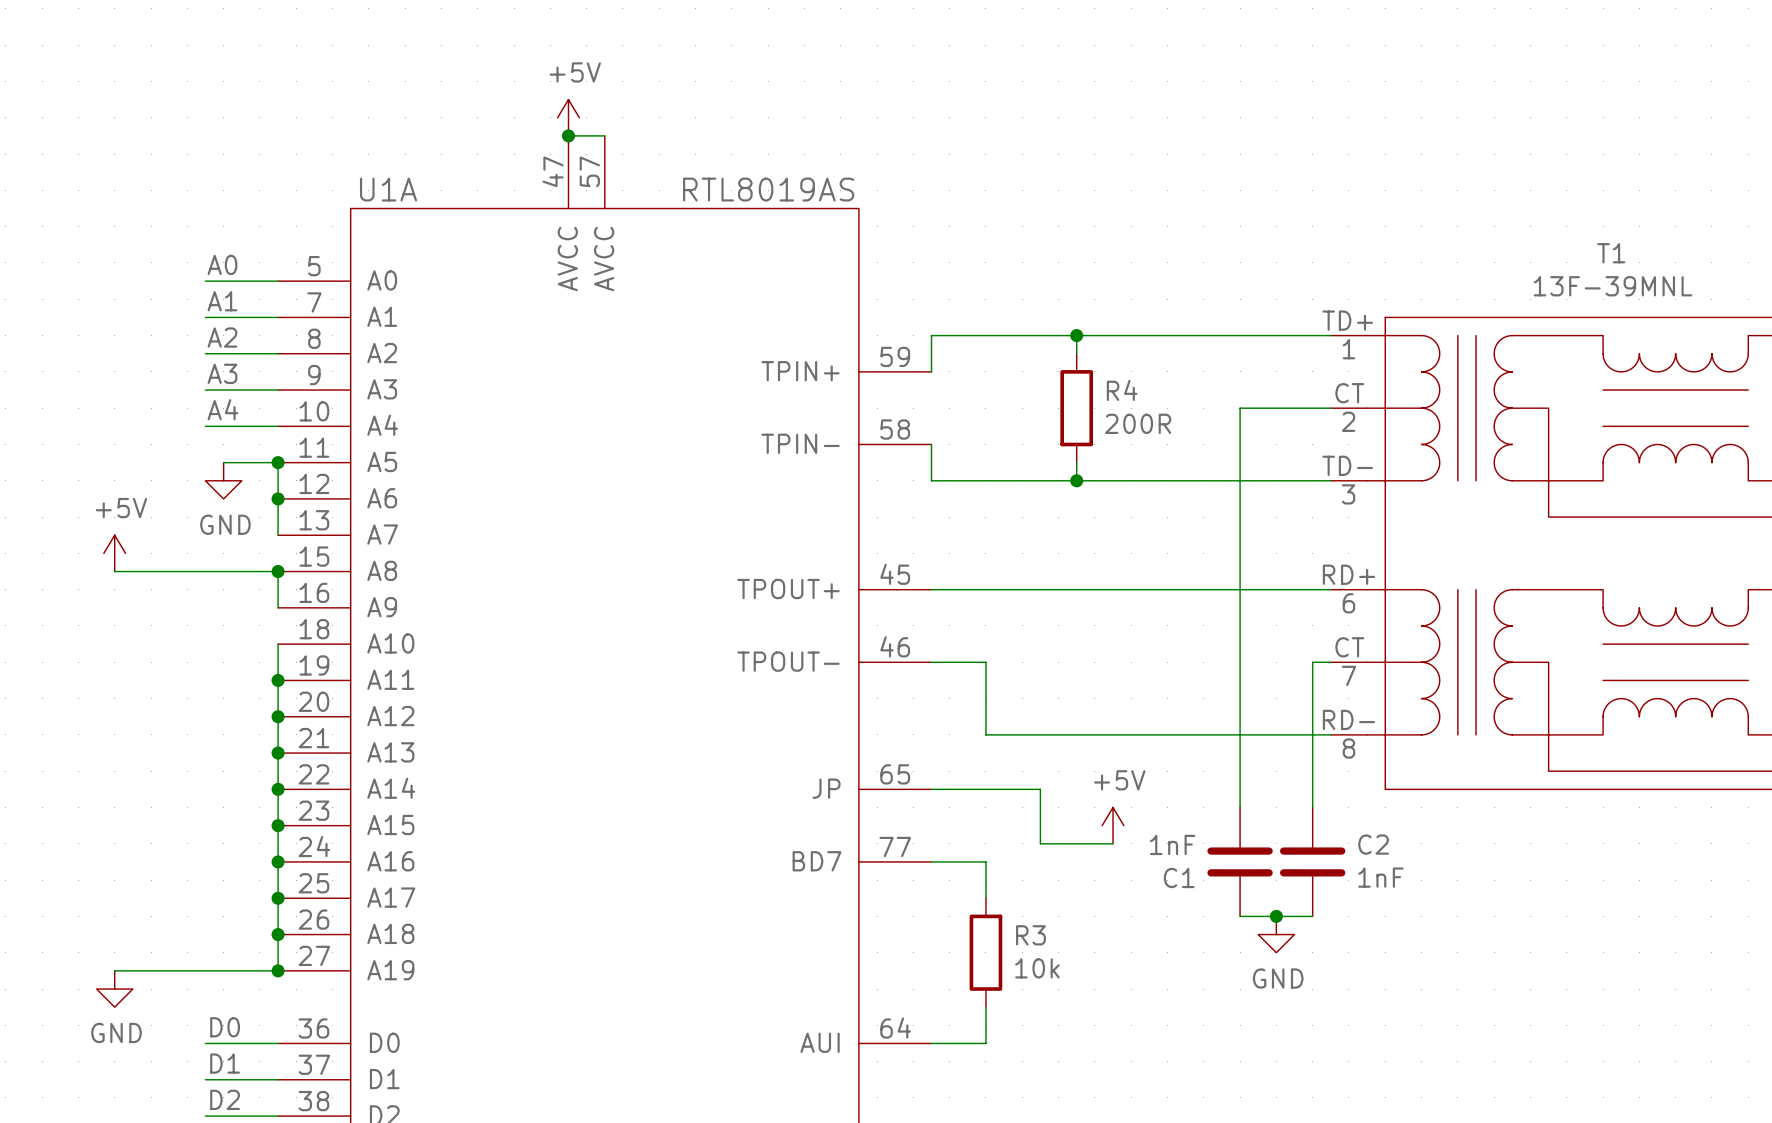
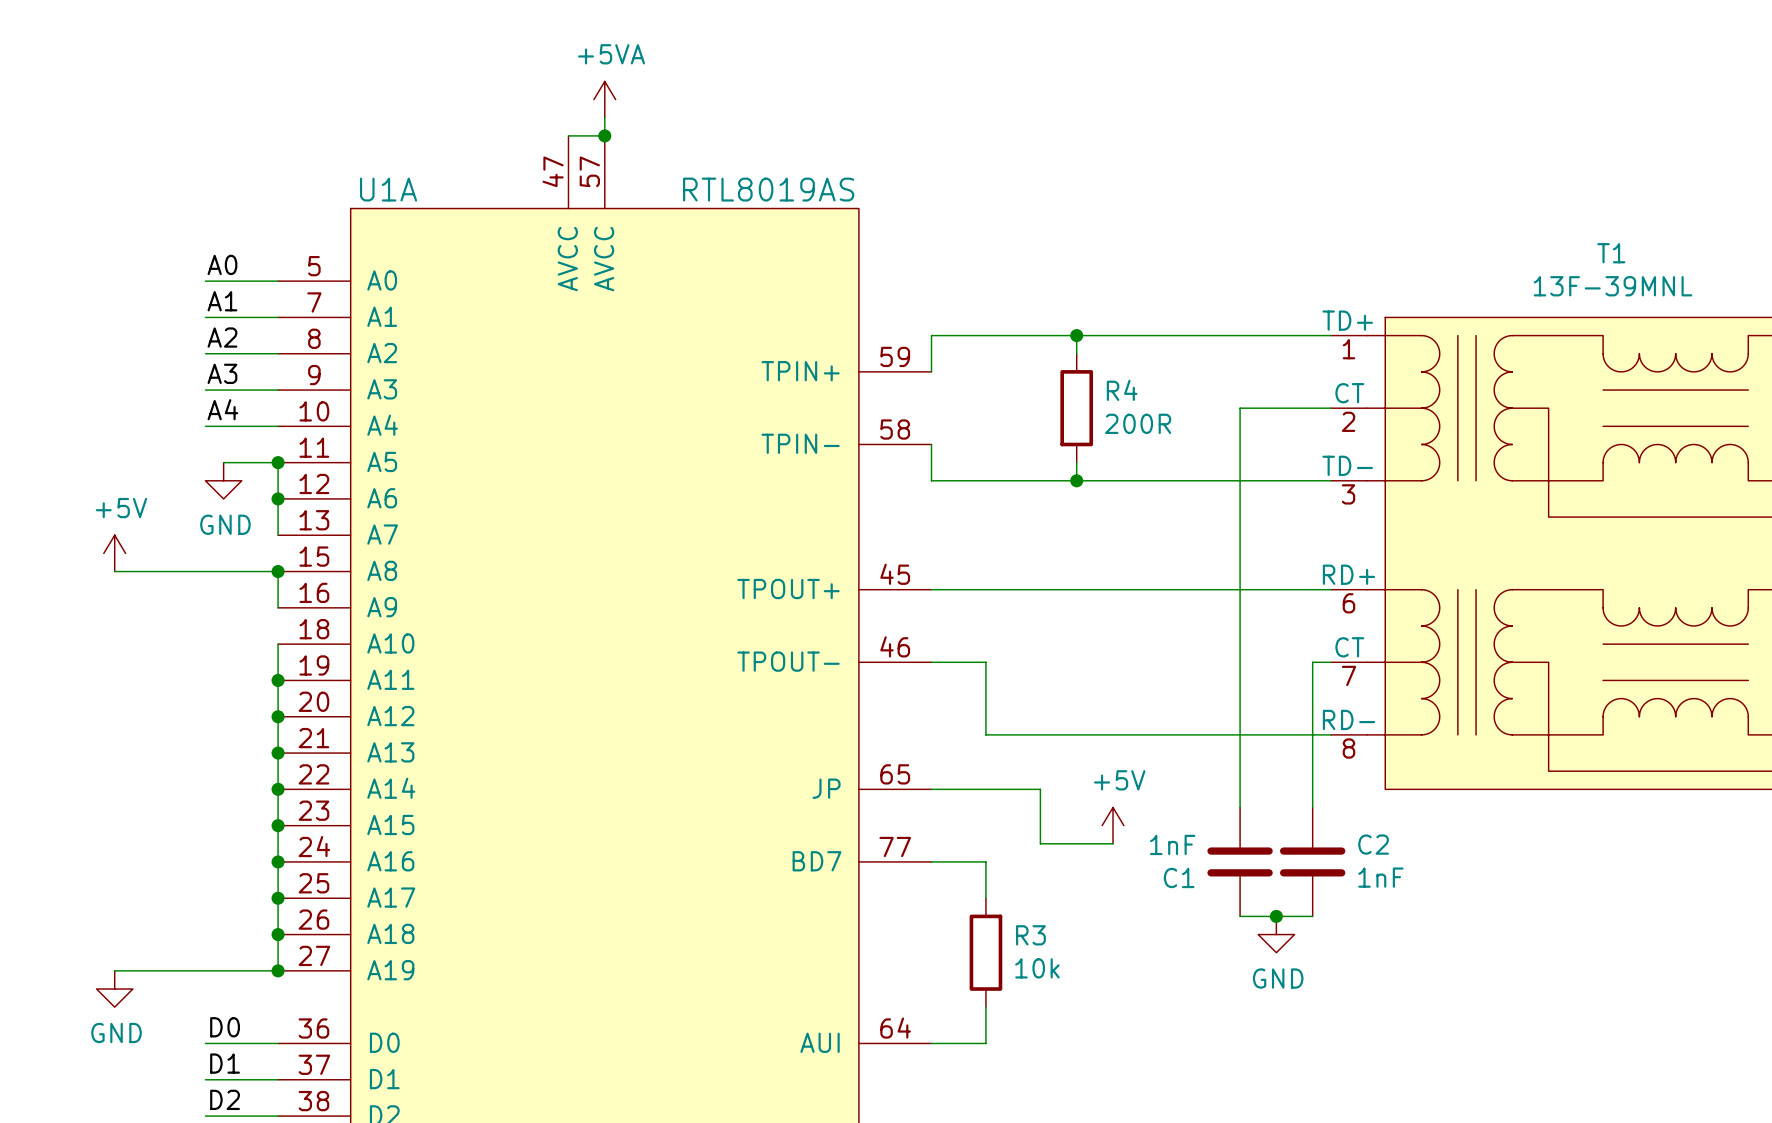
power symbol: none -> +5VA (604, 99)
power symbol: +5V (568, 117) -> none
wire: none -> (604, 117) (604, 135)
junction position: (568, 135) -> (604, 135)

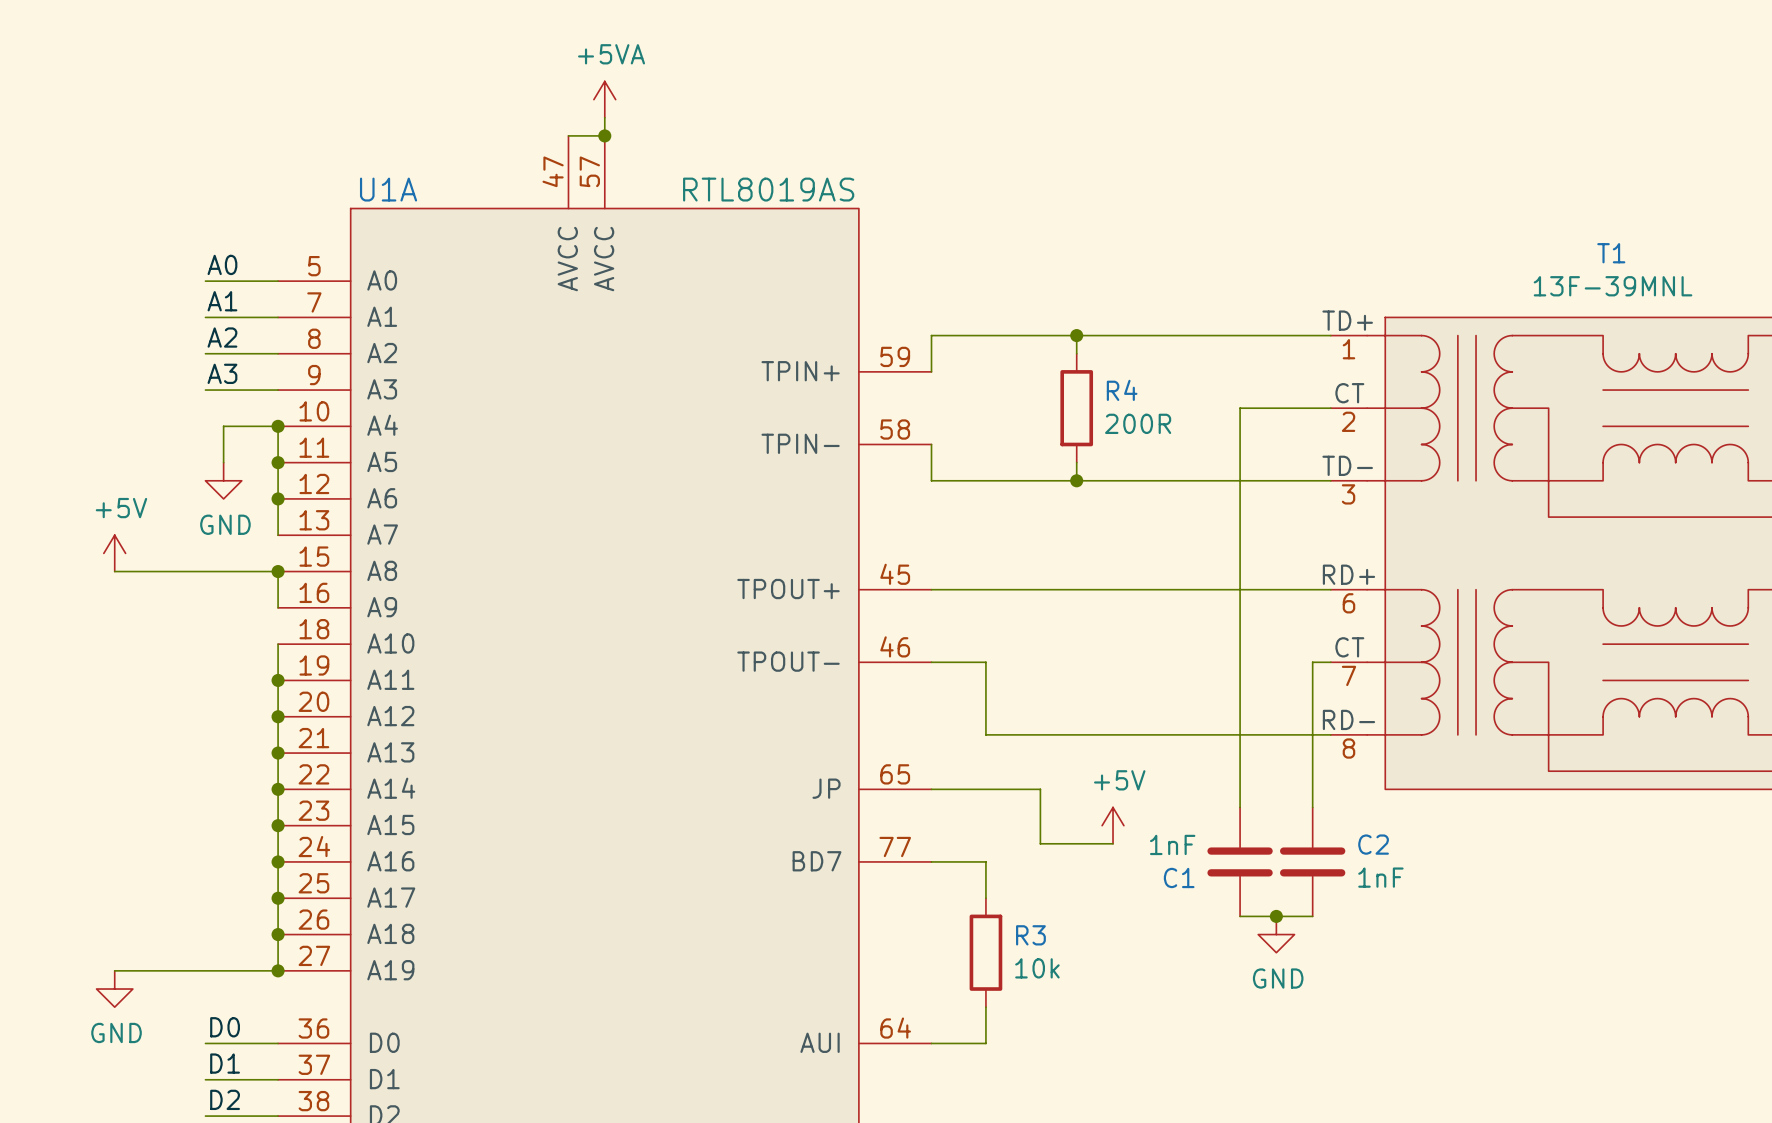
label: A4 (222, 409) -> none
wire: (205, 426) (223, 426) -> (223, 462) (223, 426)
junction: none -> (278, 426)
wire: (223, 462) (278, 462) -> (278, 426) (278, 462)

